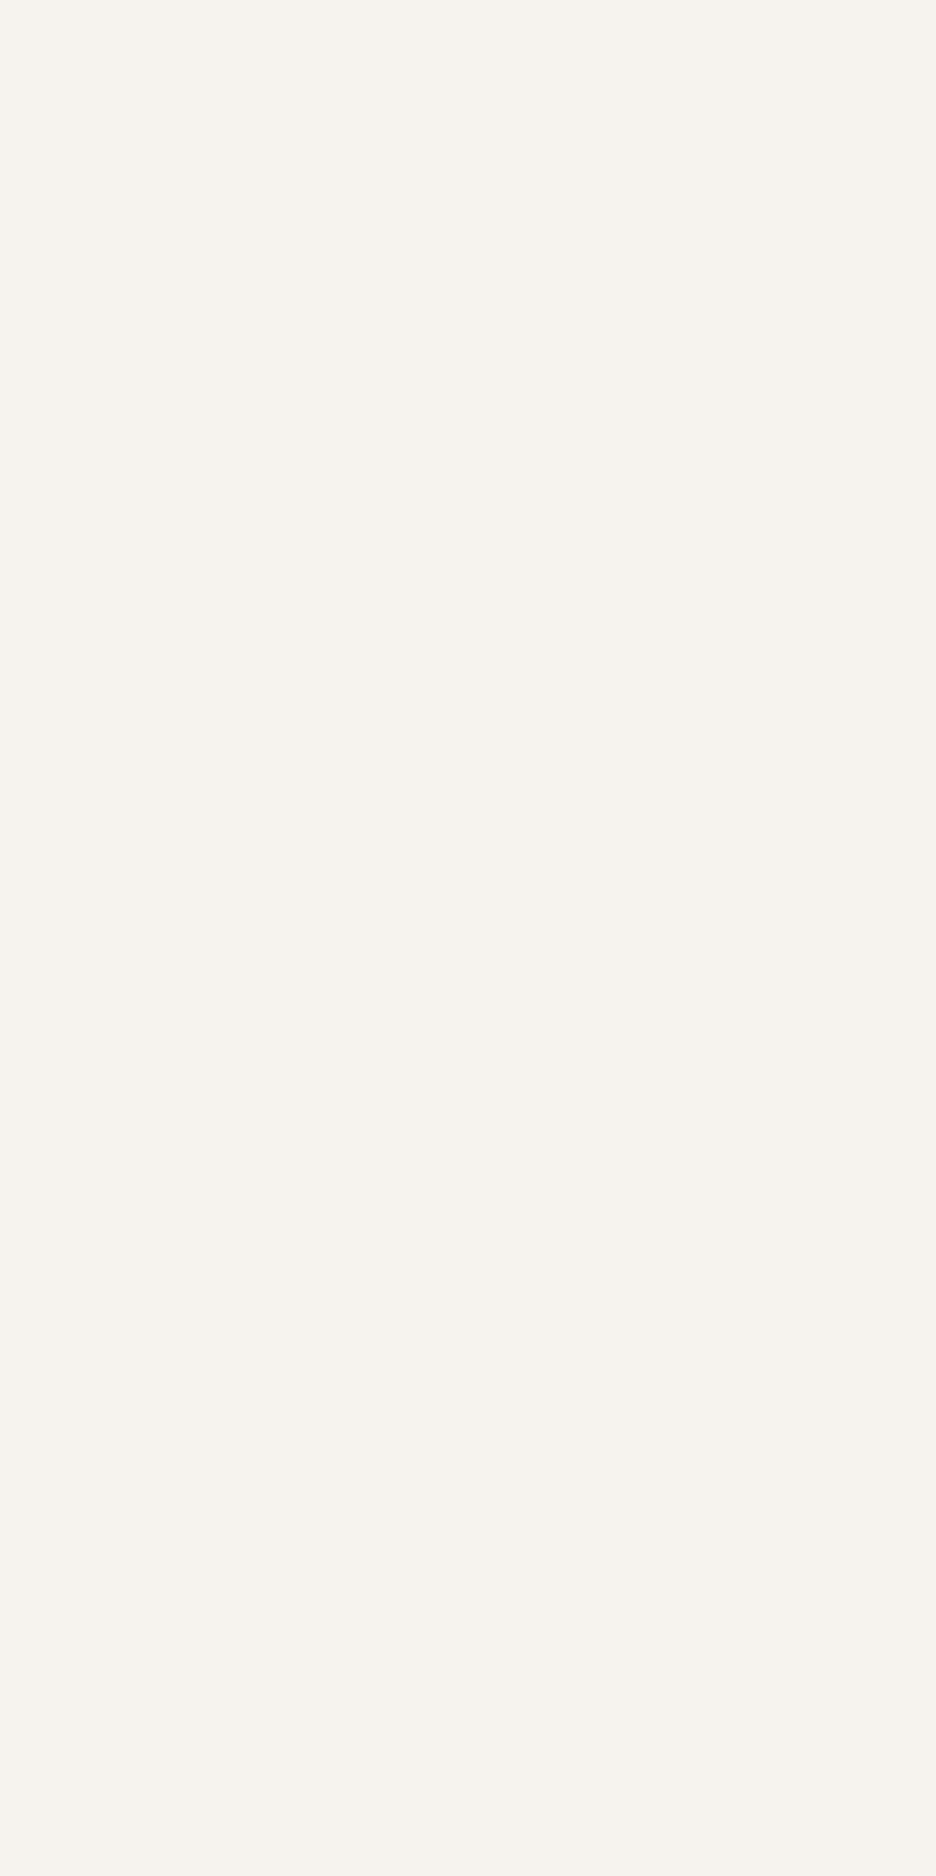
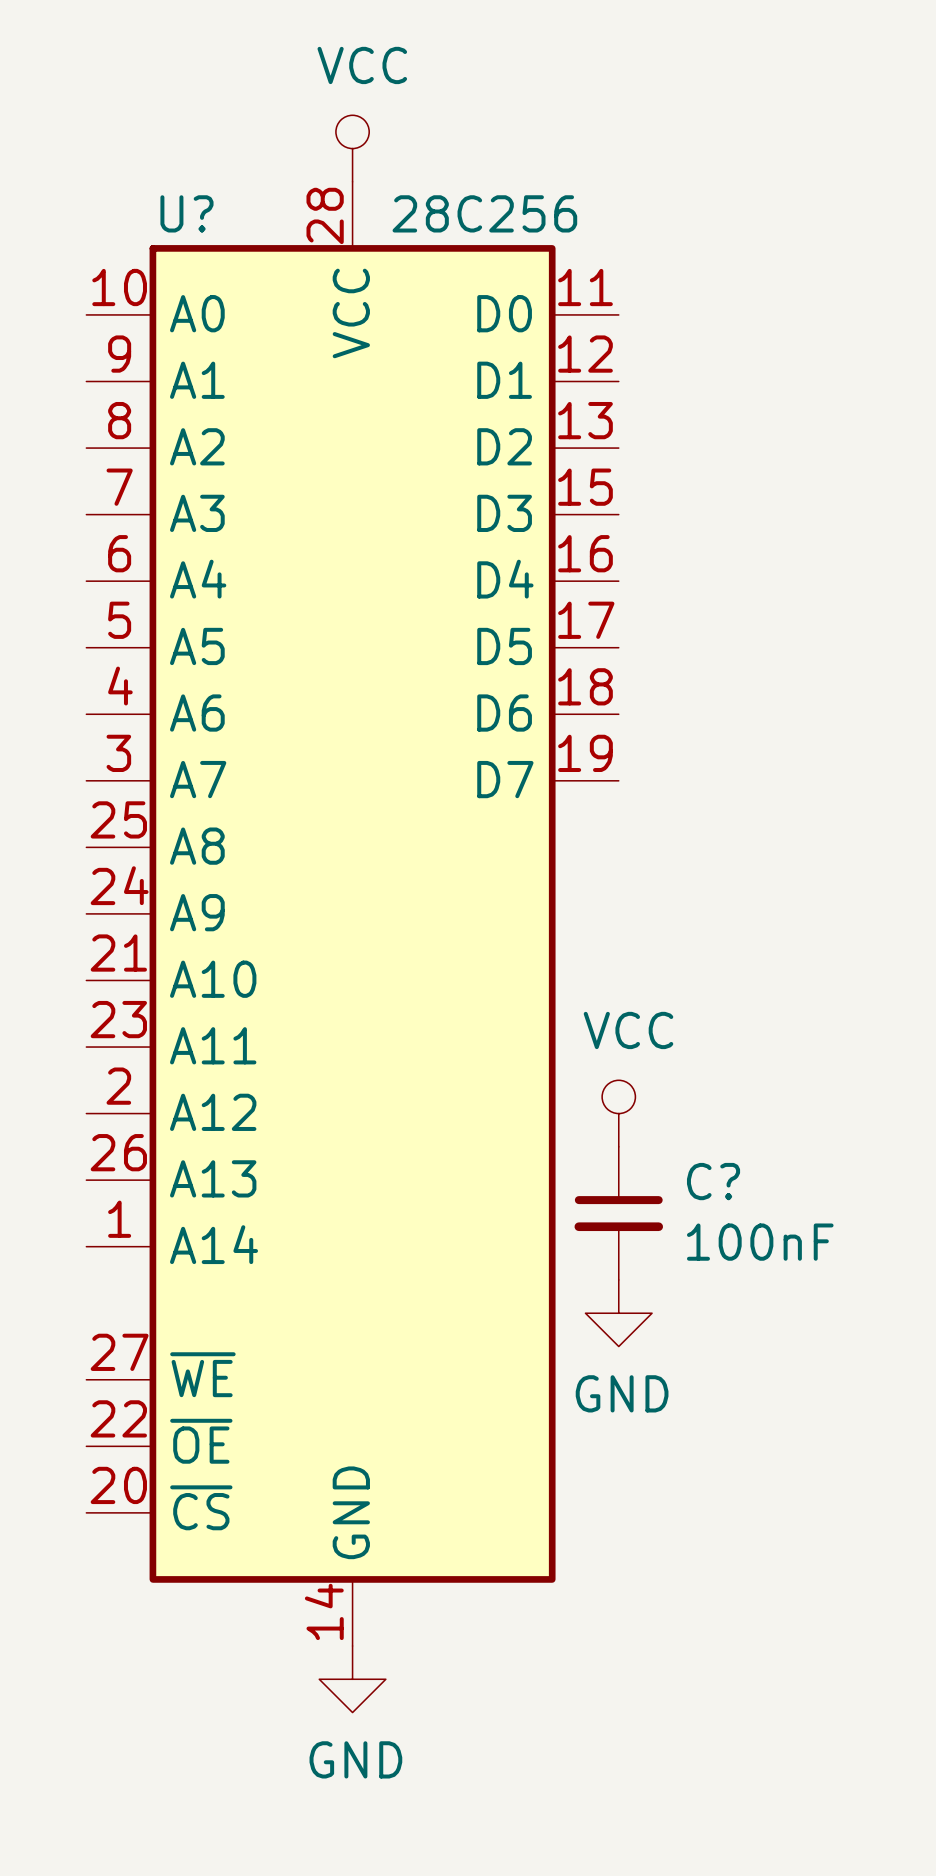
power symbol: none -> VCC (352, 148)
U?: none -> 28C256 (352, 913)
power symbol: none -> VCC (618, 1113)
C?: none -> 100nF (618, 1213)
power symbol: none -> GND (618, 1313)
power symbol: none -> GND (352, 1679)

